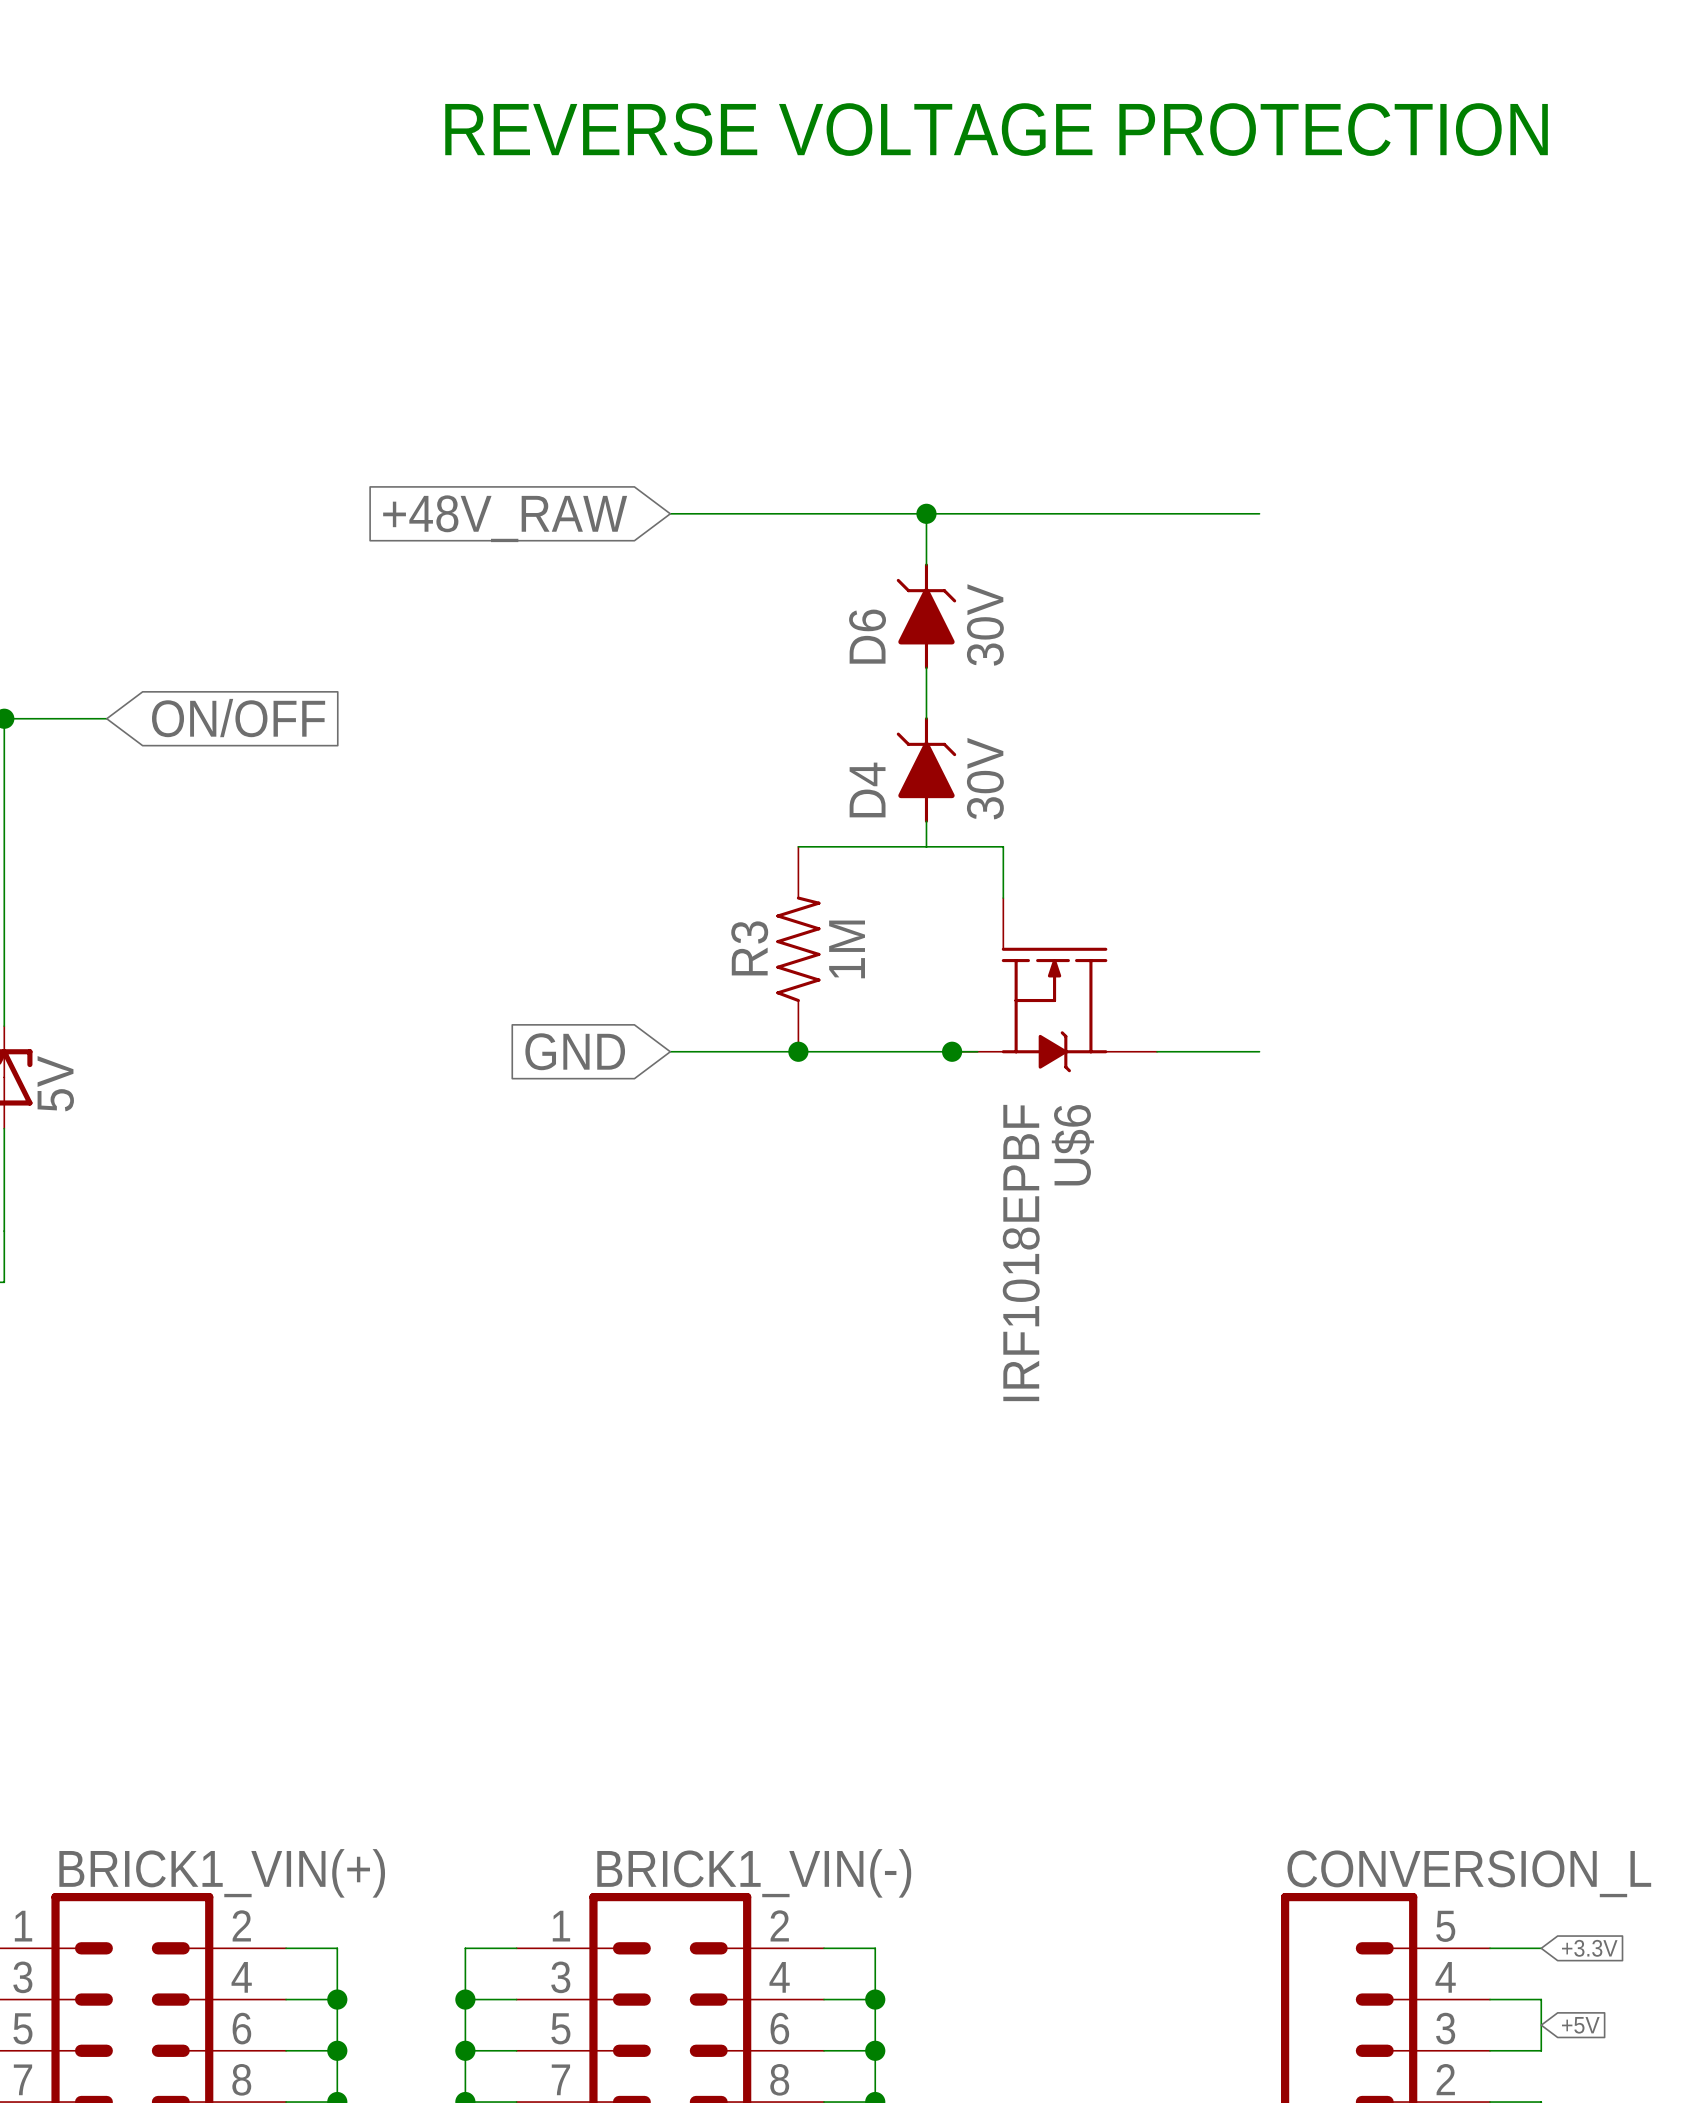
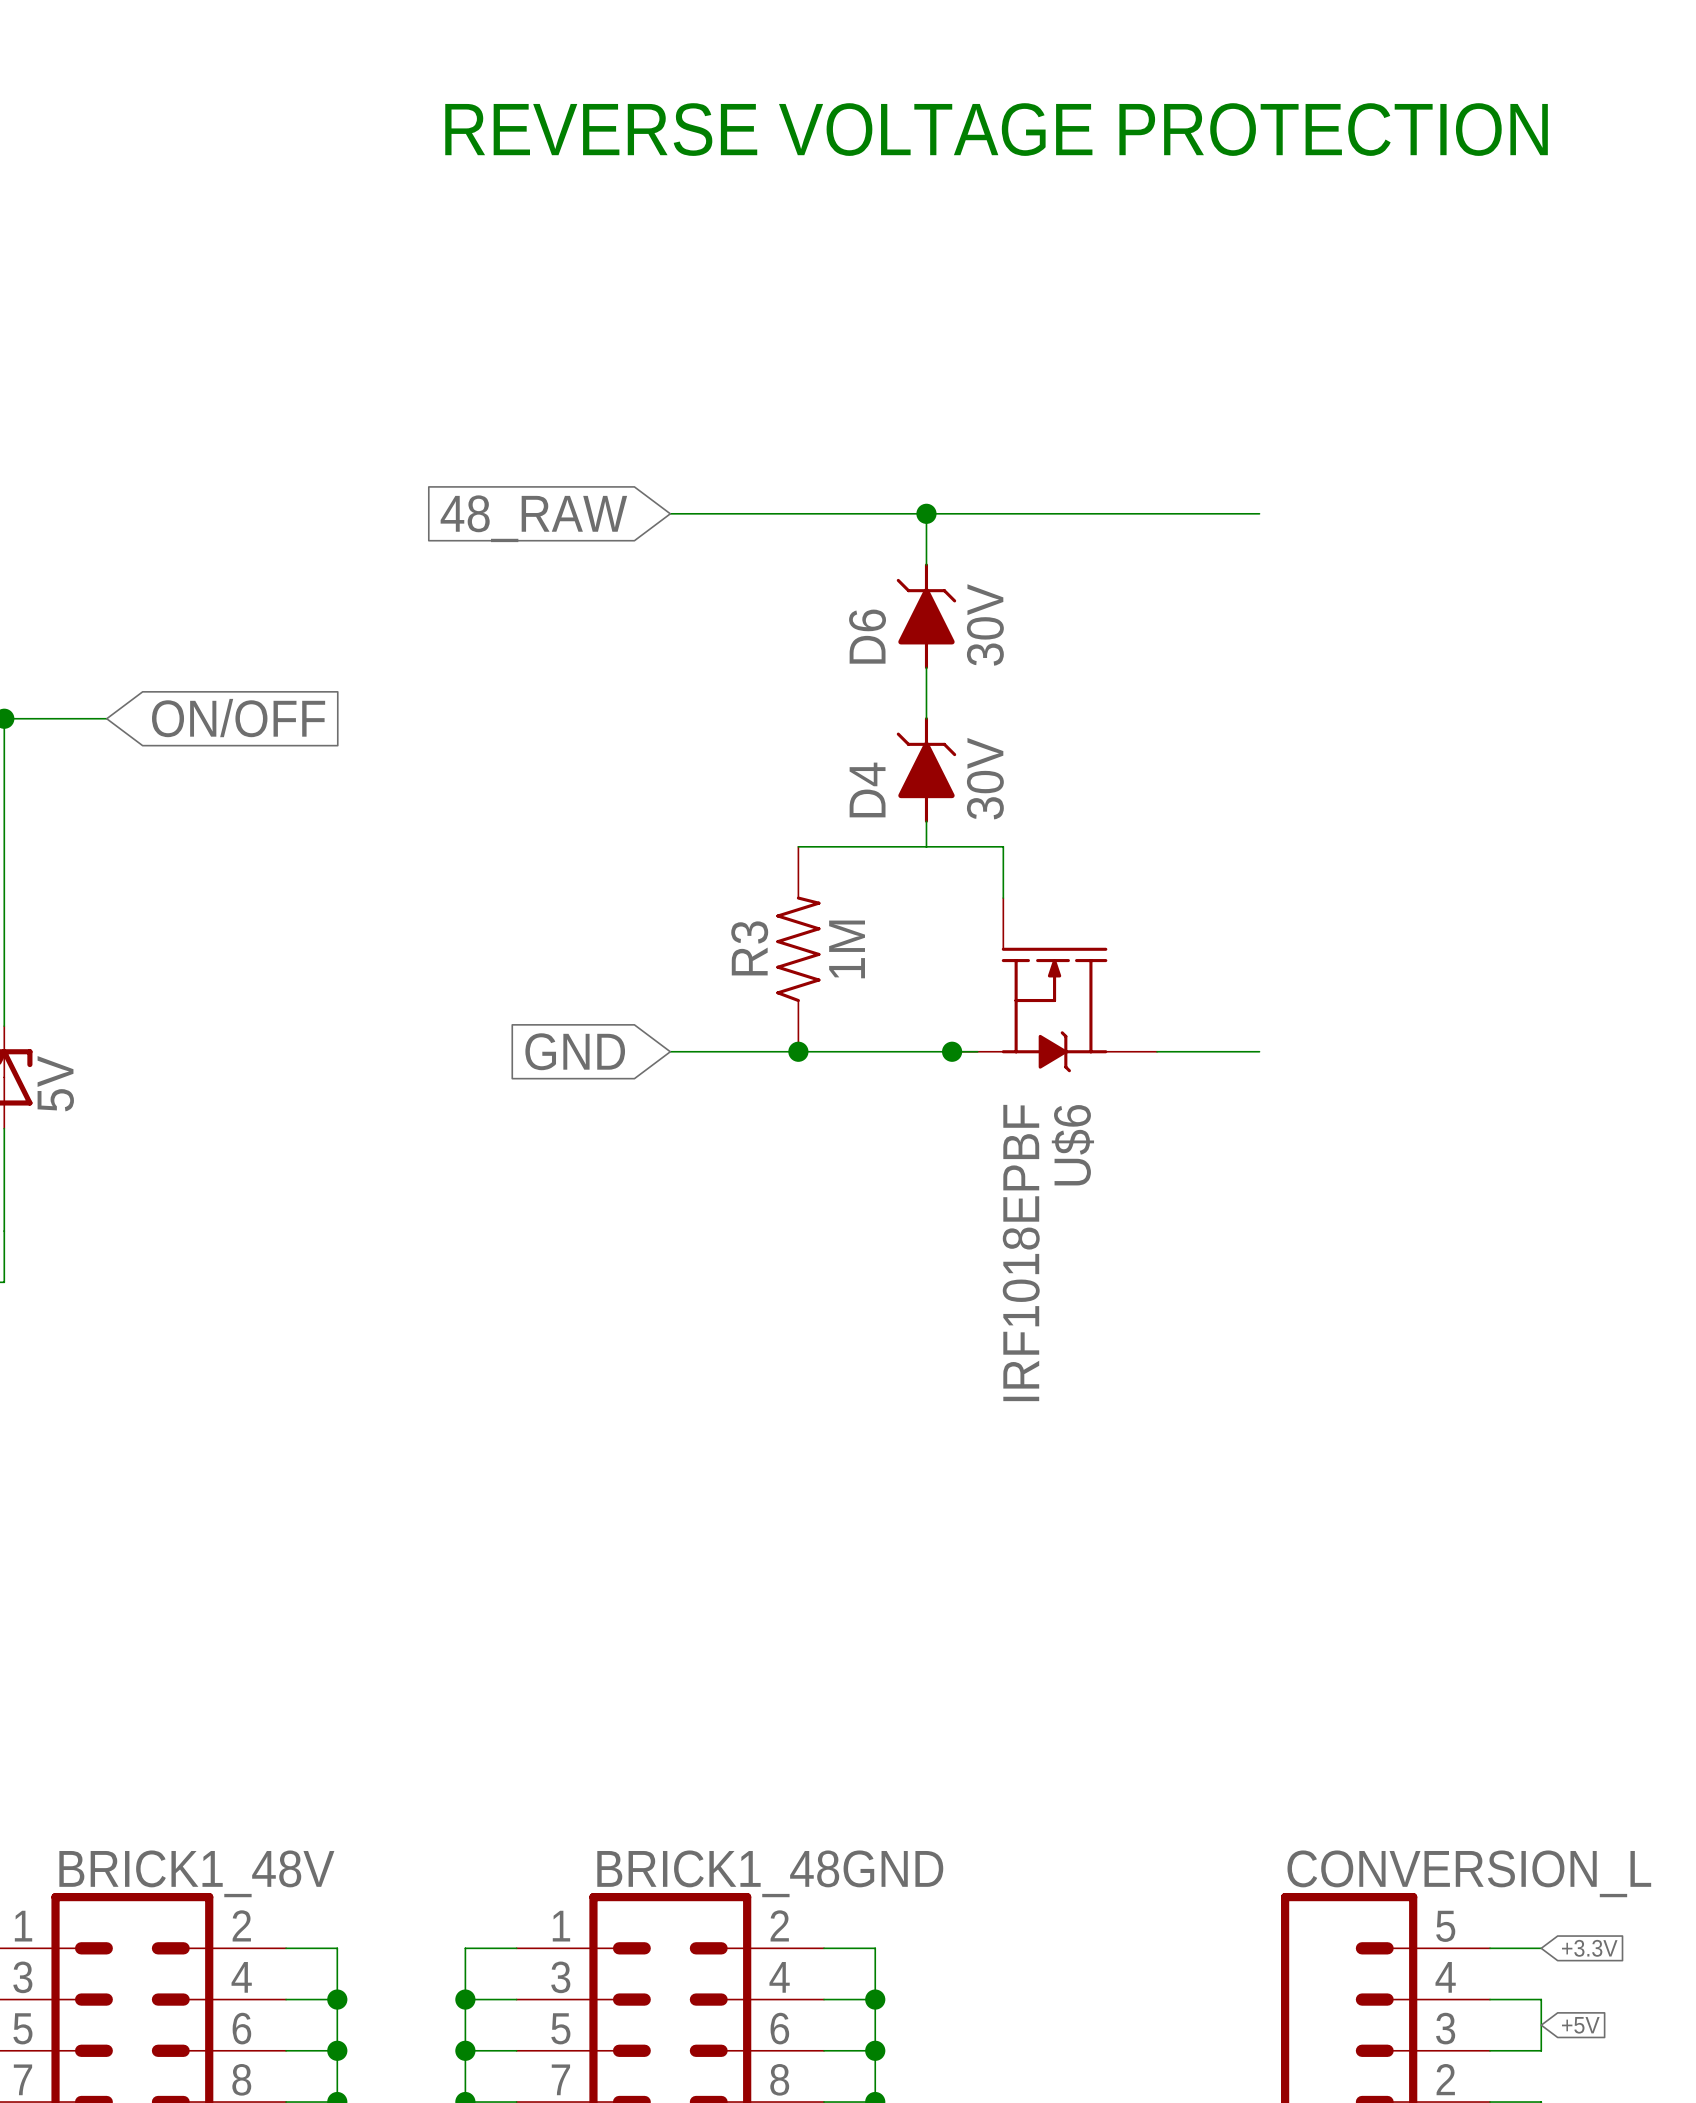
global label: +48V_RAW (505, 518) -> 48_RAW (533, 518)
BRICK1_VIN(+) name: BRICK1_VIN(+) (222, 1873) -> BRICK1_48V (196, 1873)
BRICK1_VIN(-) name: BRICK1_VIN(-) (754, 1873) -> BRICK1_48GND (770, 1873)

